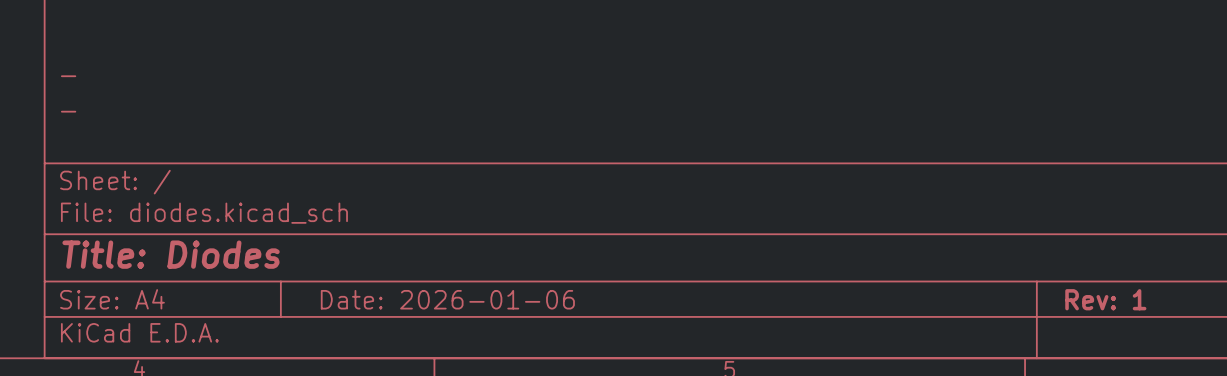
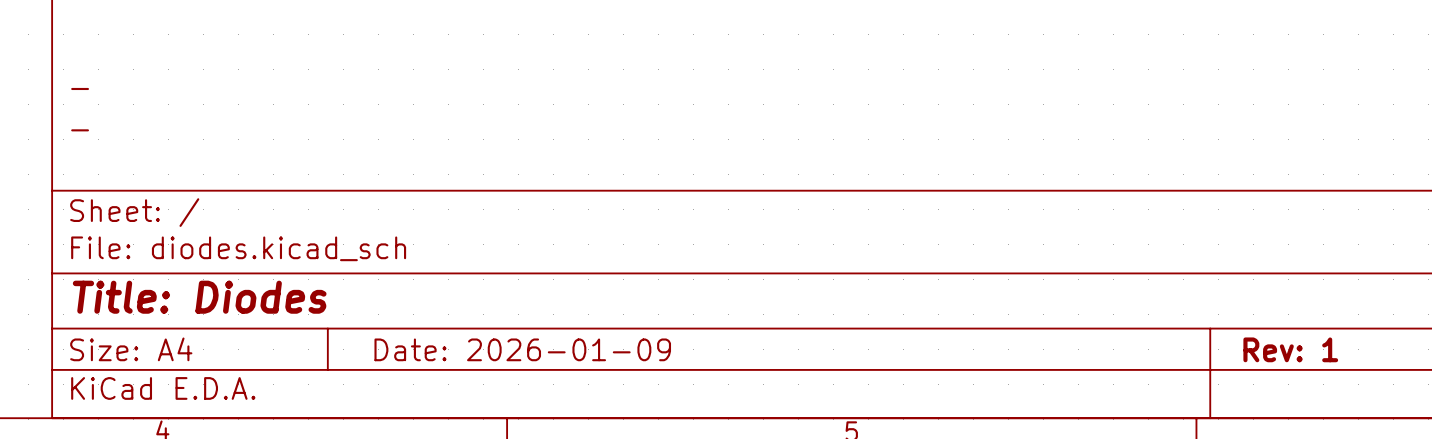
title block: Date: 2026-01-06 (447, 299) -> Date: 2026-01-09 (522, 349)

